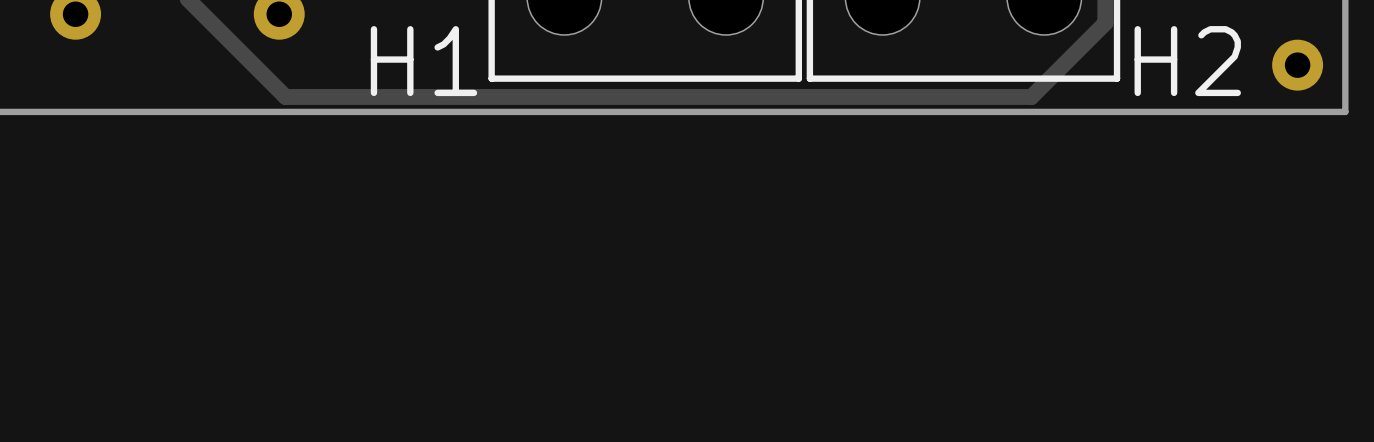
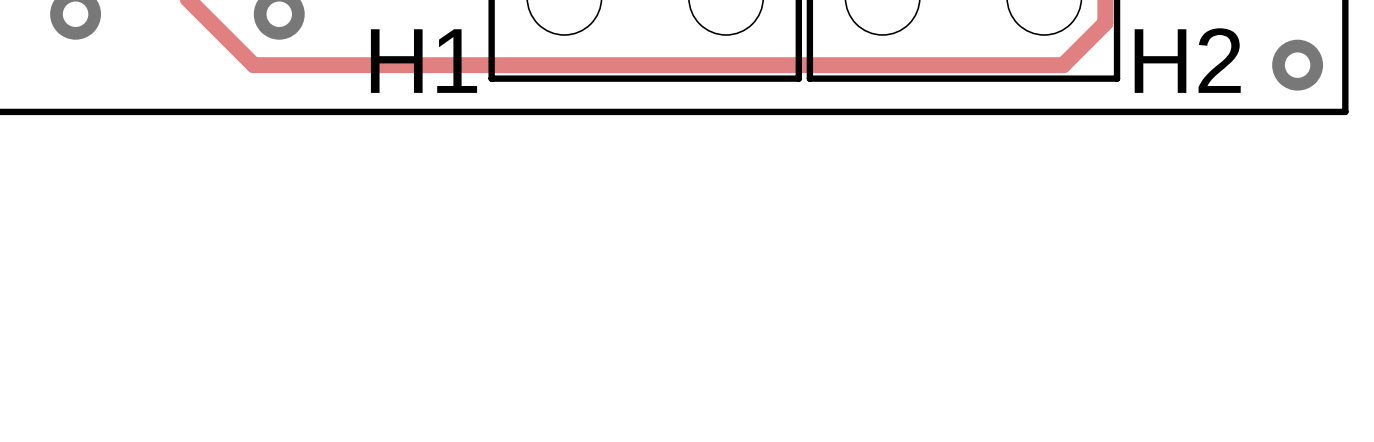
track: (253, 65) (285, 96) (1031, 96) (1063, 65) -> (253, 65) (1063, 65)

